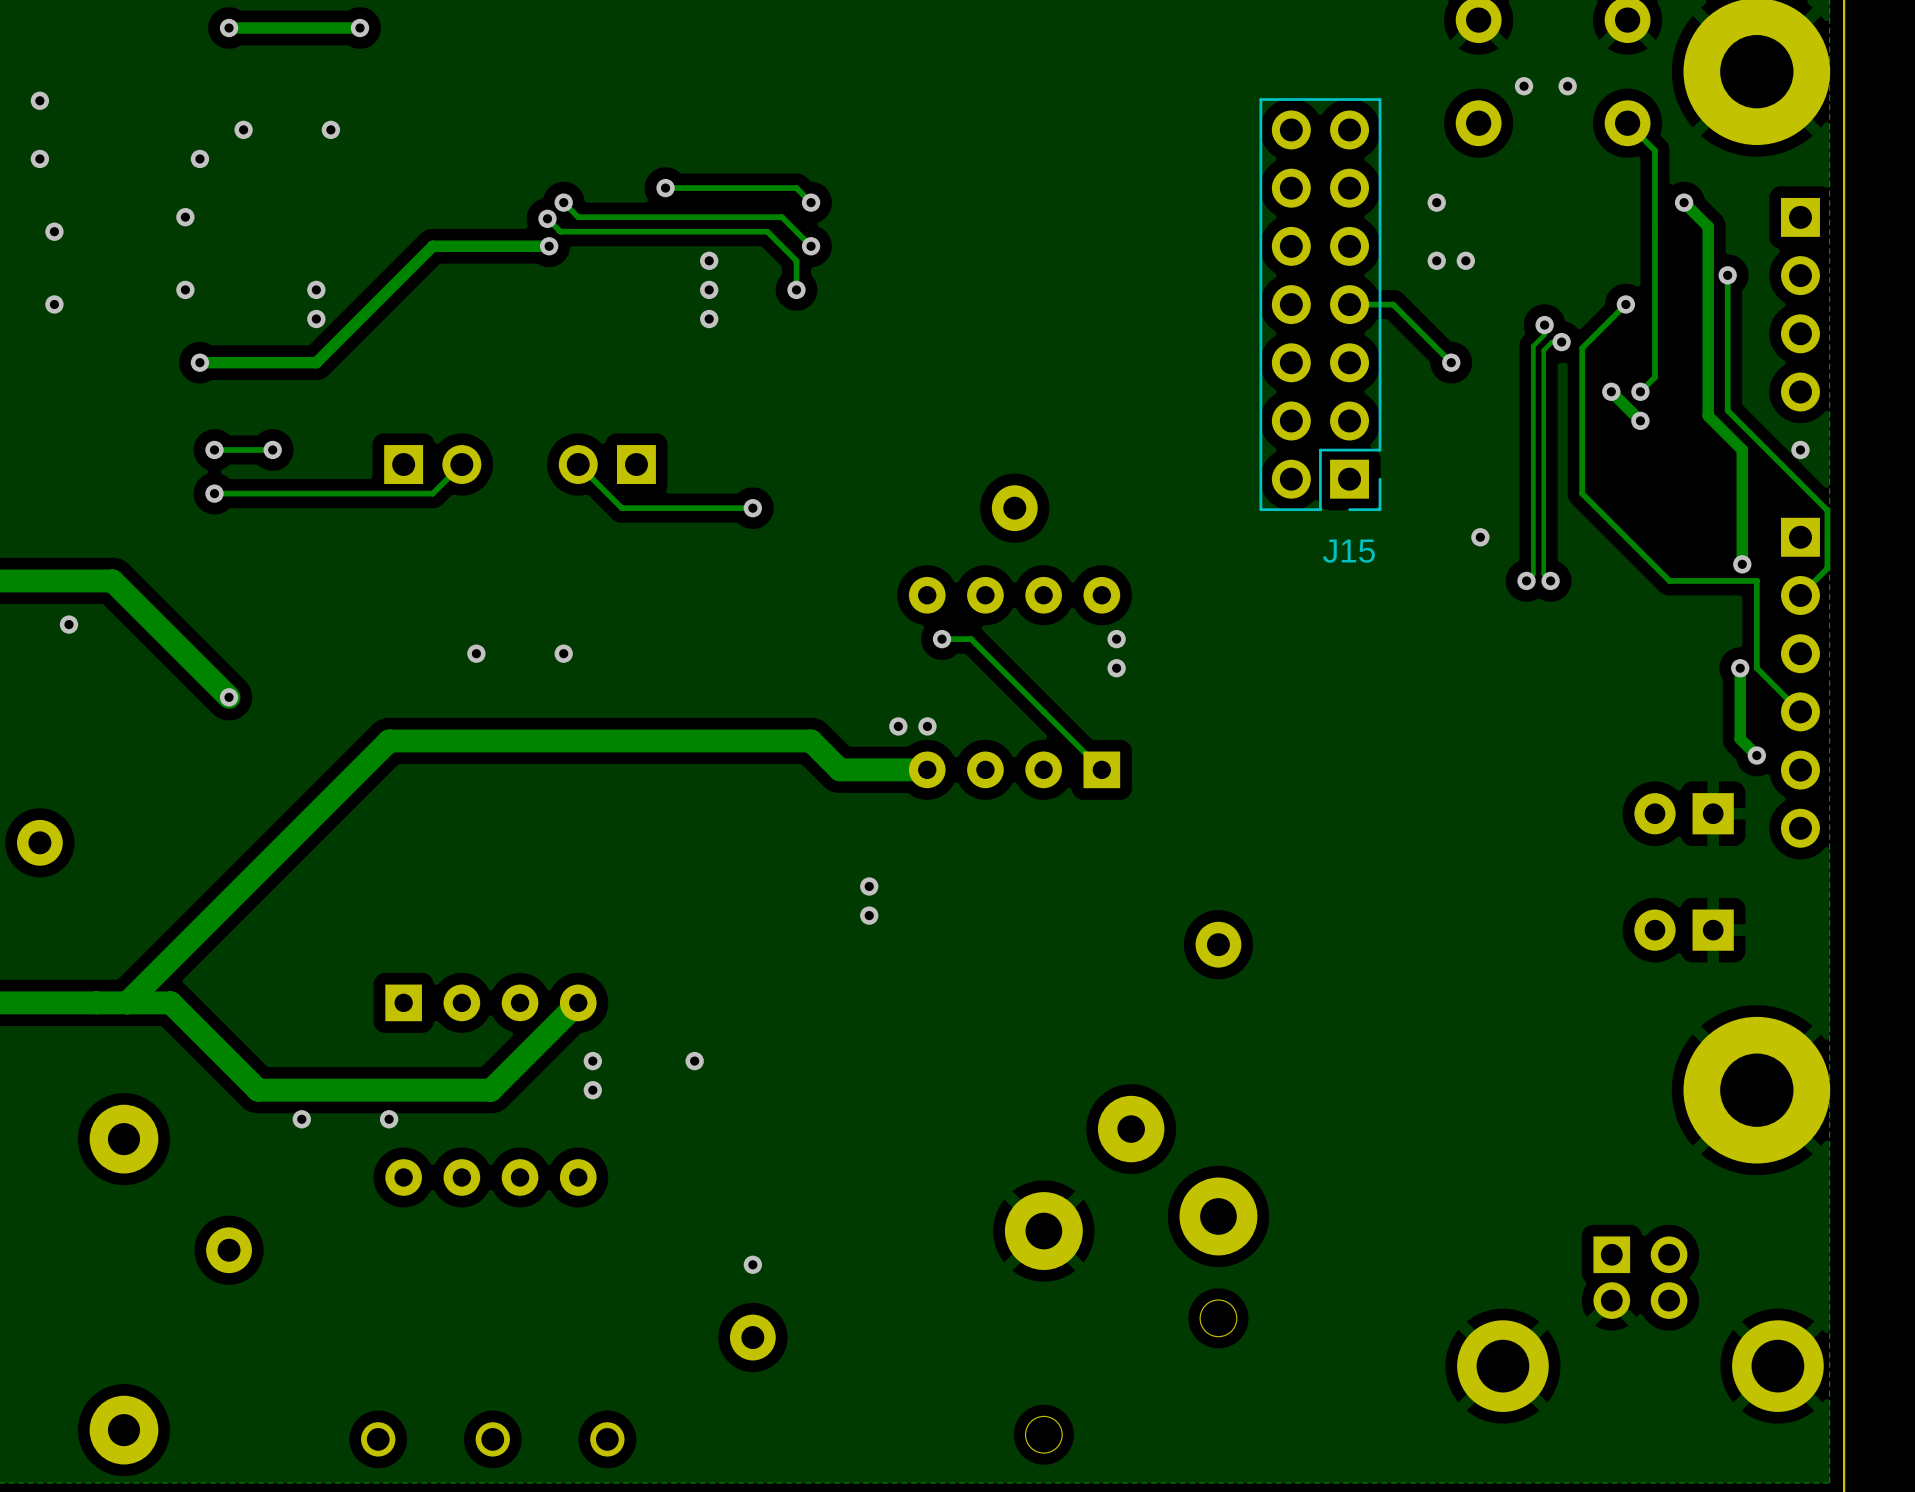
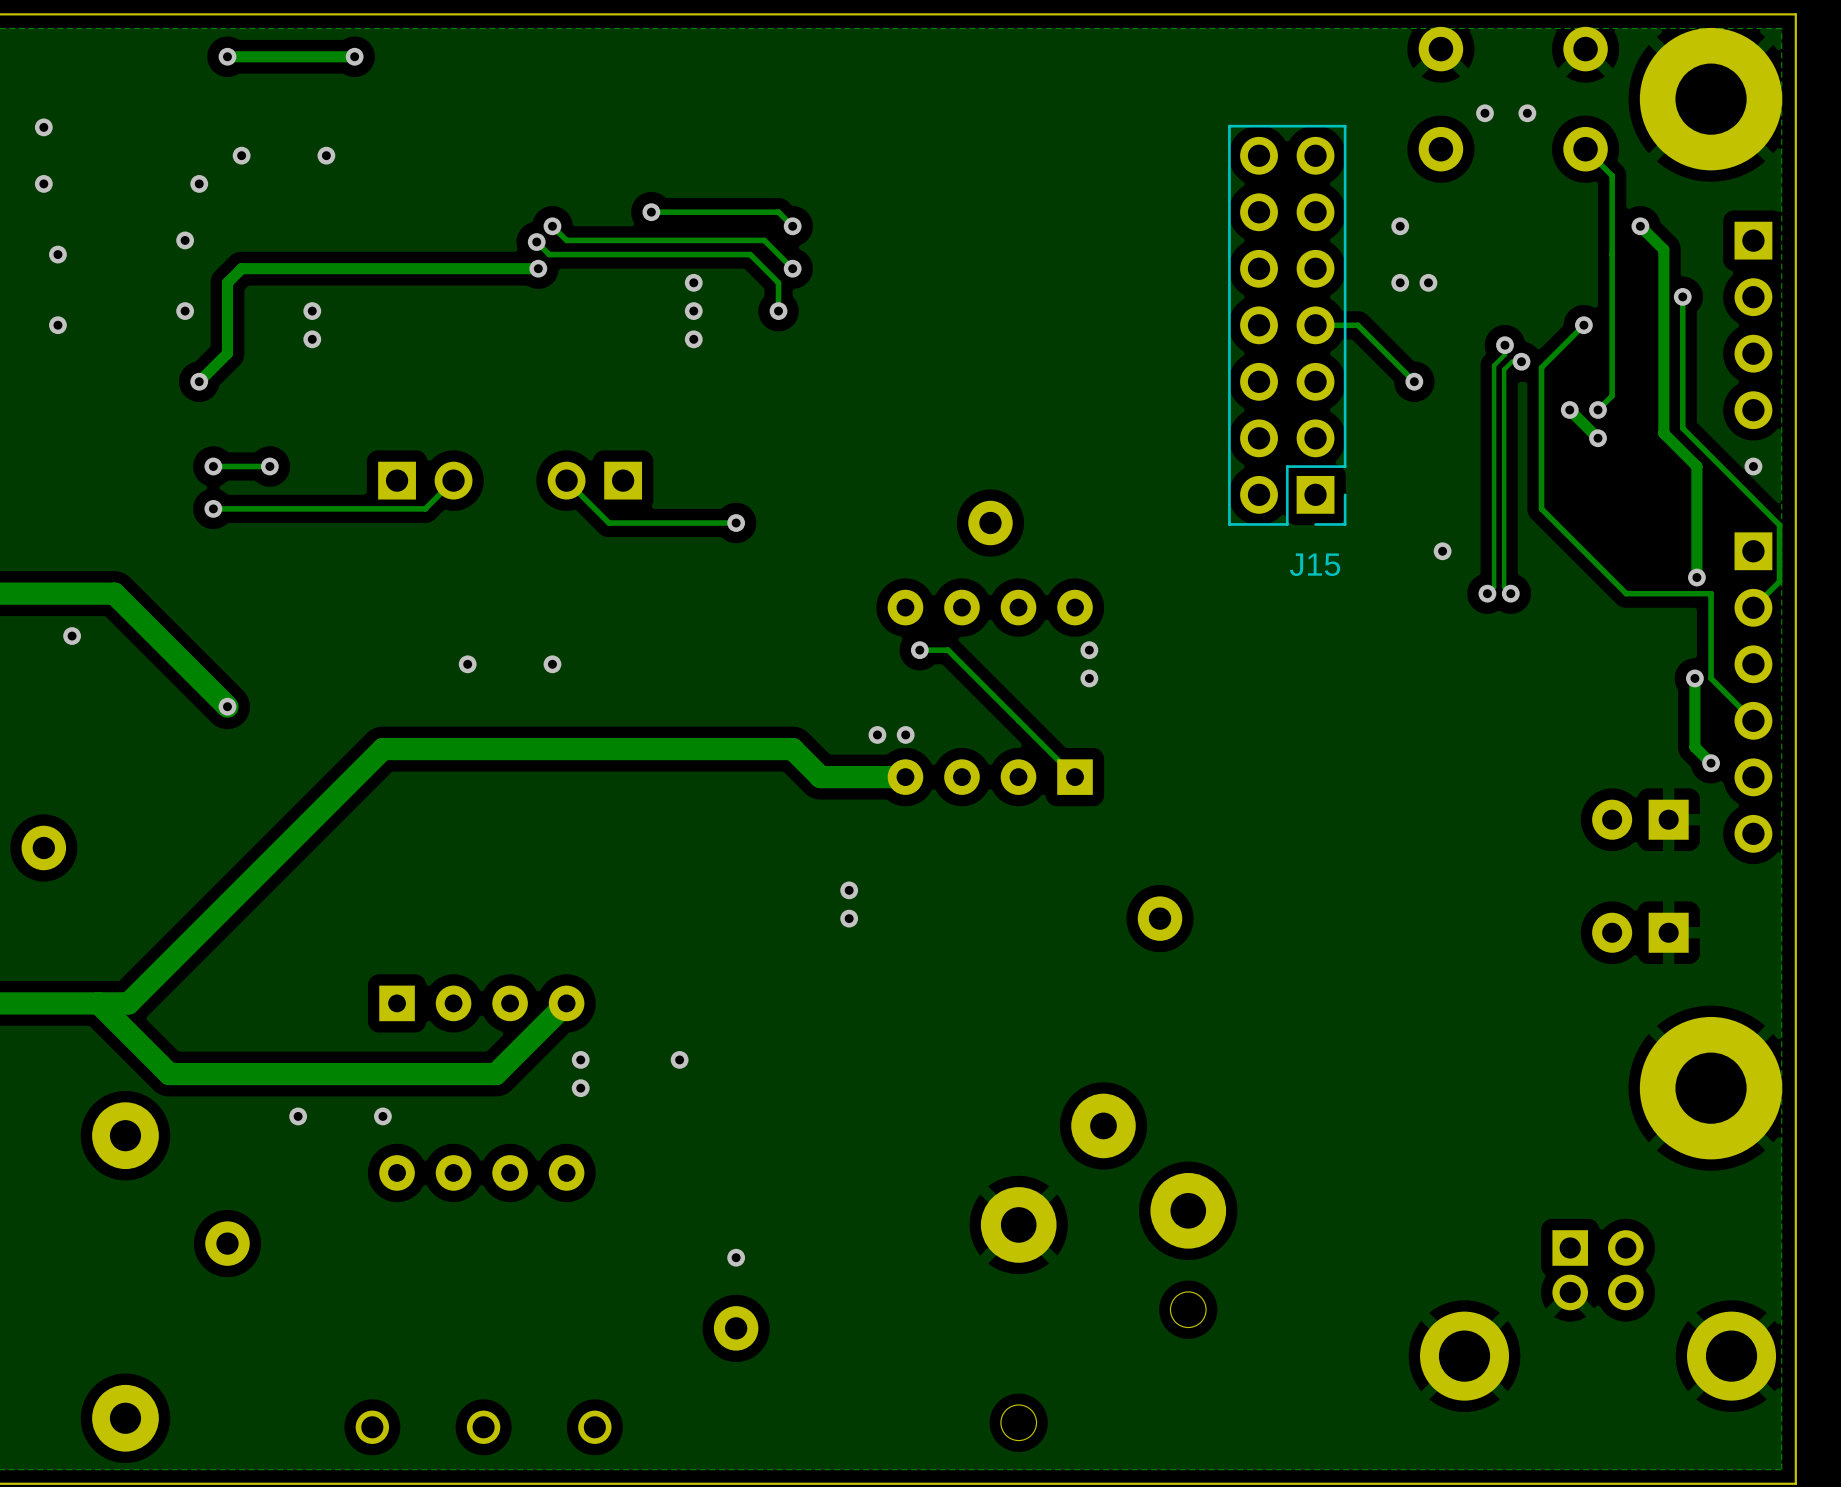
track: (432, 246) (316, 362) (199, 362) -> (425, 268) (241, 268) (227, 282) (227, 353) (199, 381)
part position: (1218, 944) -> (1160, 918)
track: (127, 1002) (170, 1002) (258, 1090) (490, 1090) (505, 1075) -> (98, 1003) (169, 1074) (495, 1074)

